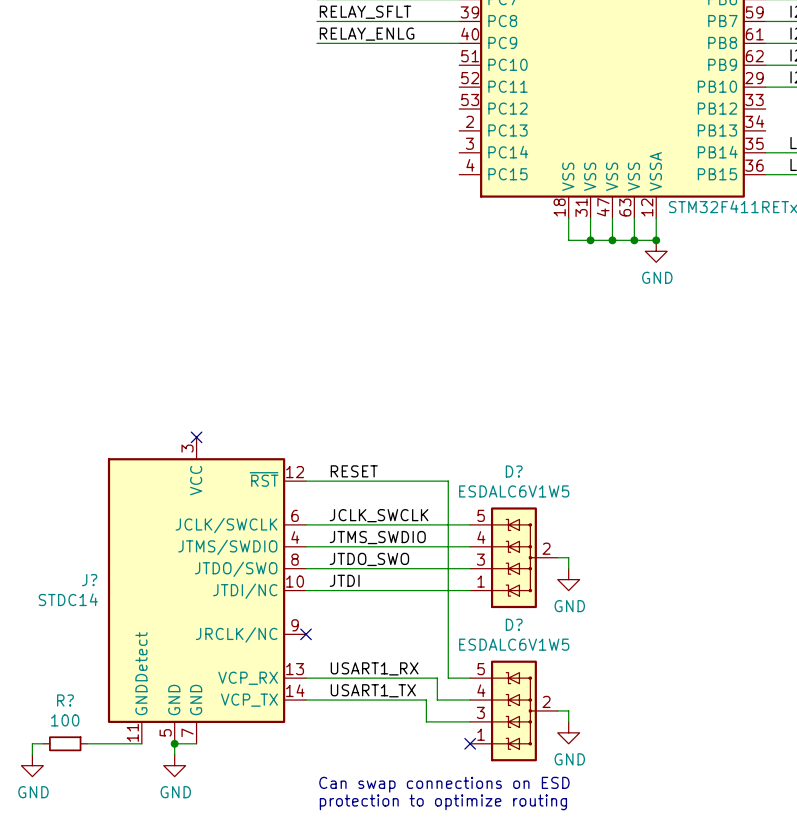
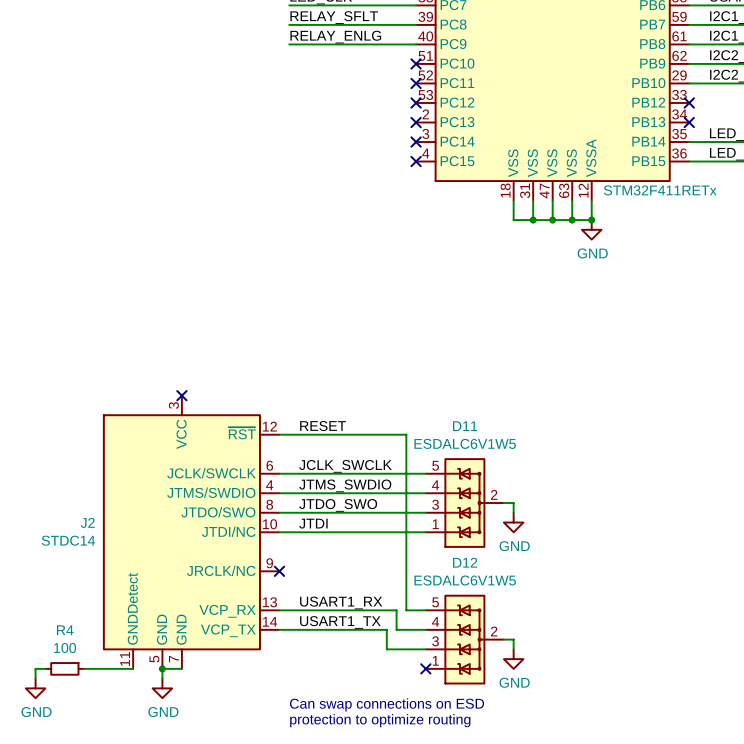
no-connect mark: none -> (416, 63)
no-connect mark: none -> (416, 83)
no-connect mark: none -> (416, 102)
no-connect mark: none -> (689, 102)
no-connect mark: none -> (416, 122)
no-connect mark: none -> (689, 122)
no-connect mark: none -> (416, 142)
no-connect mark: none -> (416, 161)
D? name: D? (514, 471) -> D11 (465, 426)
J? name: J? (89, 580) -> J2 (87, 522)
D? name: D? (514, 624) -> D12 (465, 562)
R? name: R? (65, 700) -> R4 (65, 630)

